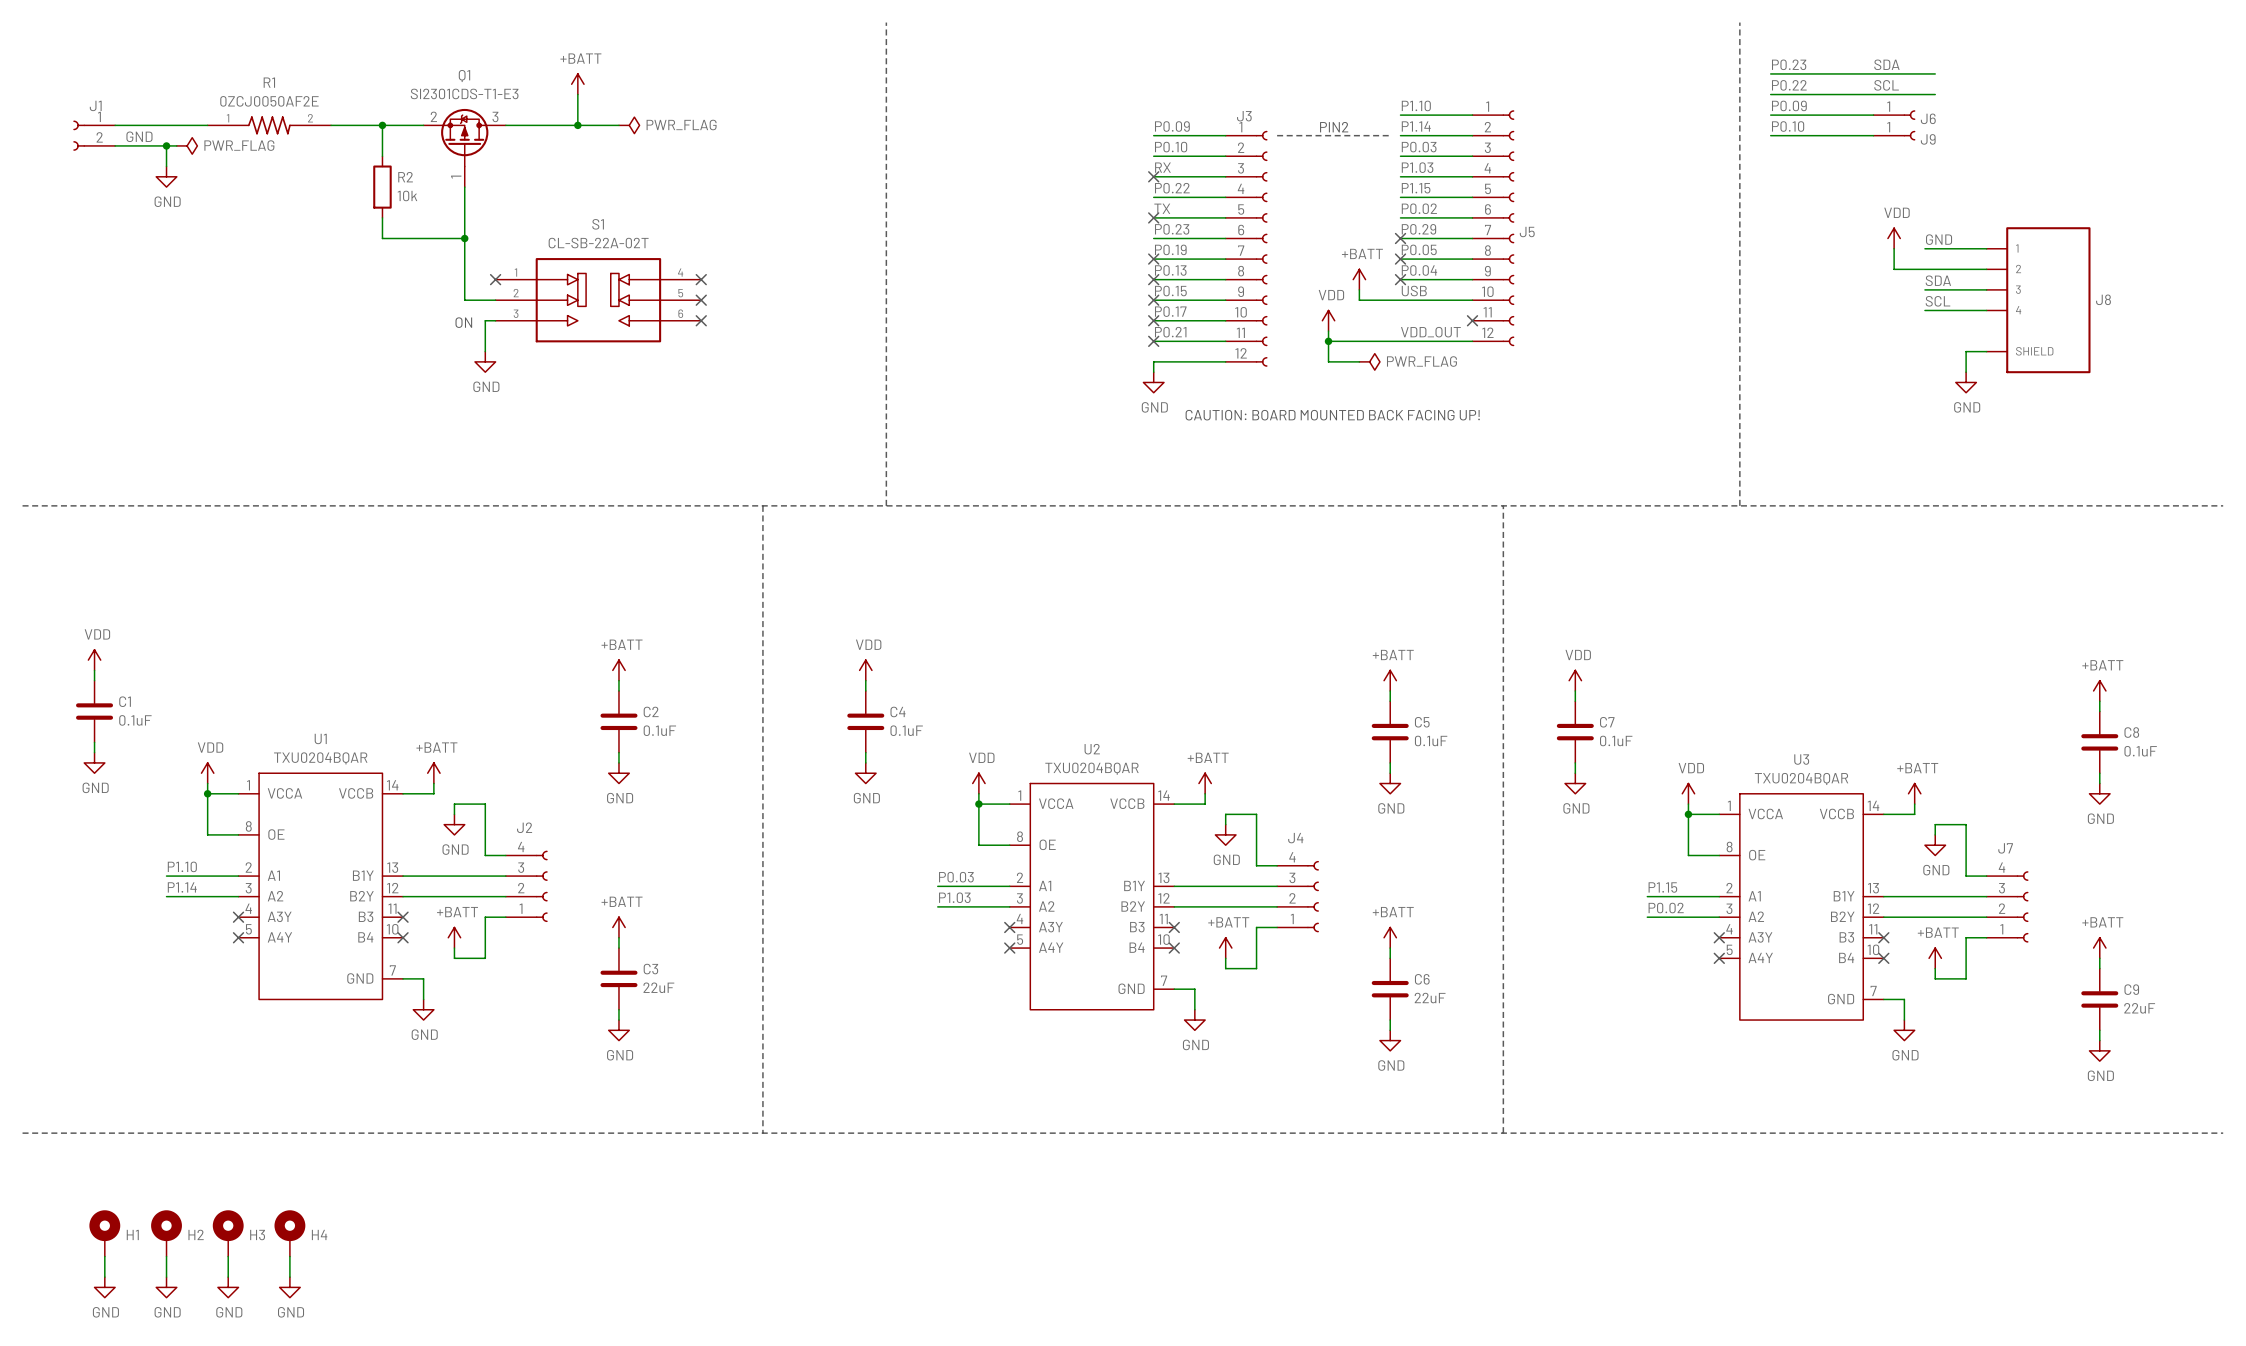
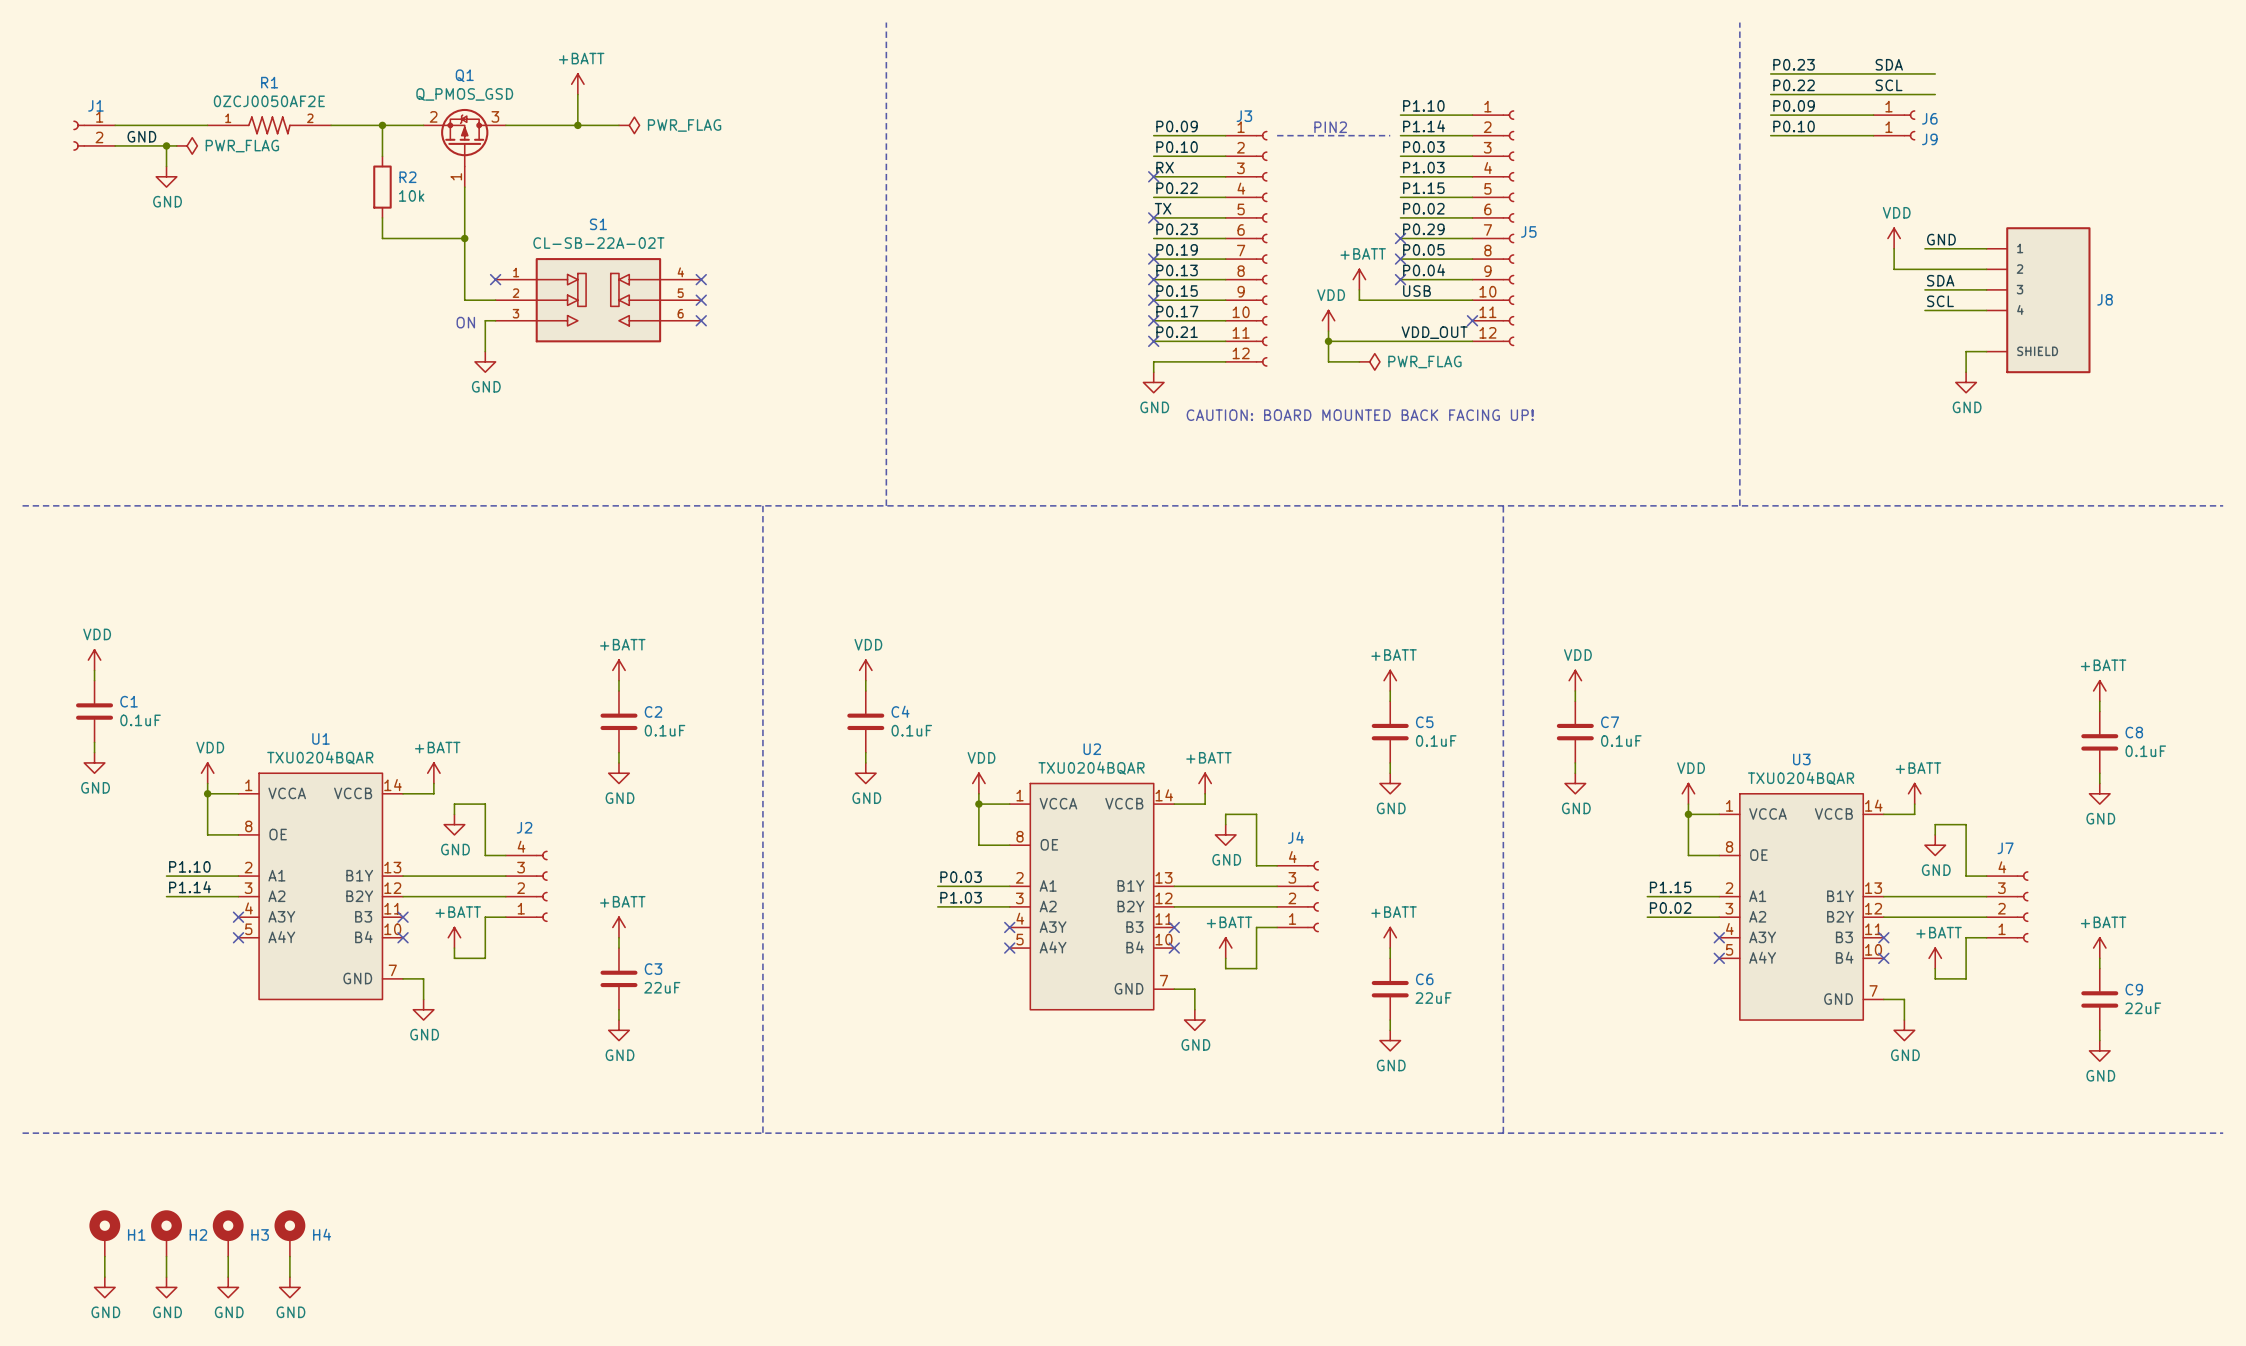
Q1 value: SI2301CDS-T1-E3 (464, 93) -> Q_PMOS_GSD (464, 94)

